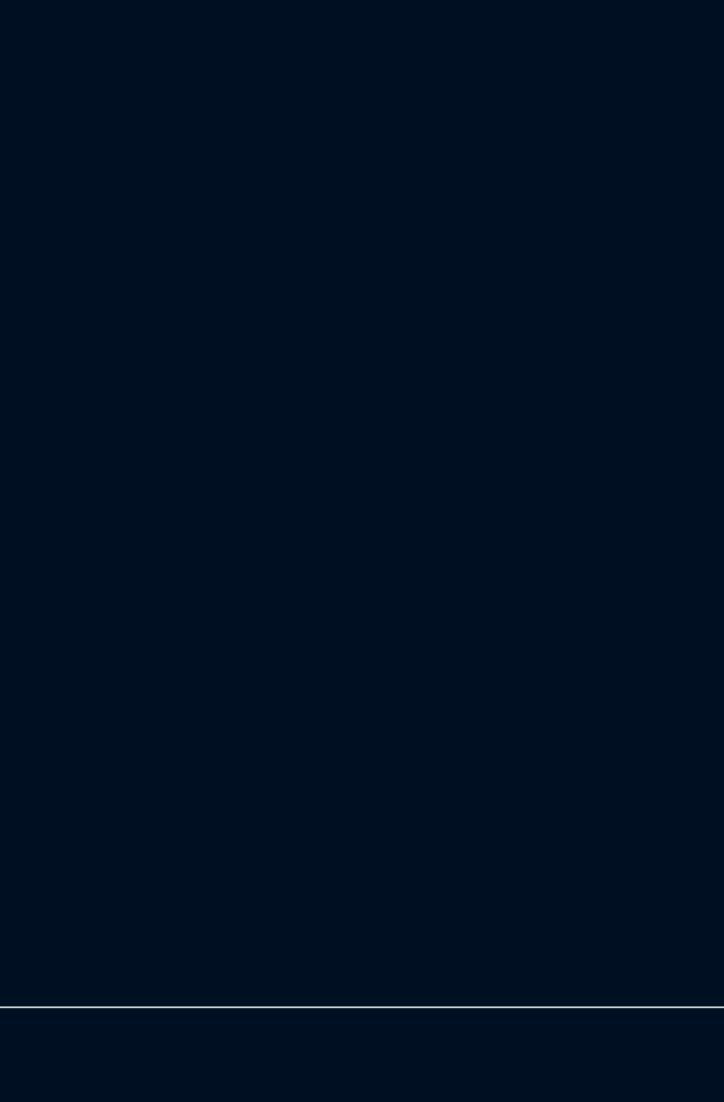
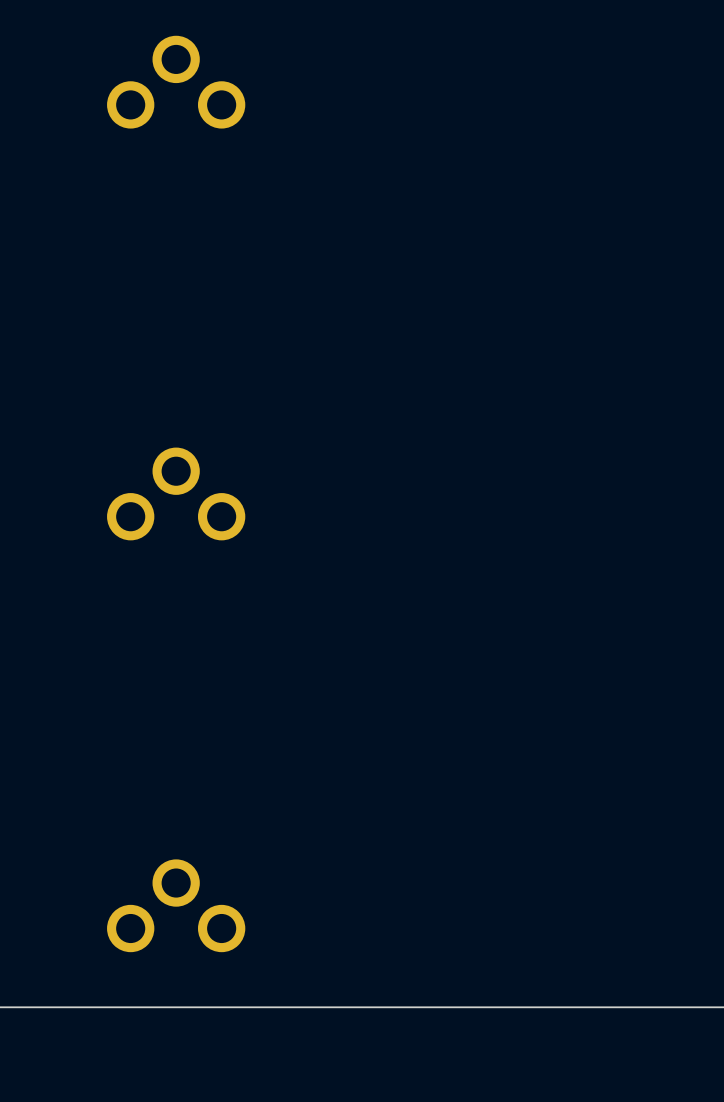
part: none -> (176, 82)
part: none -> (176, 493)
part: none -> (176, 905)

